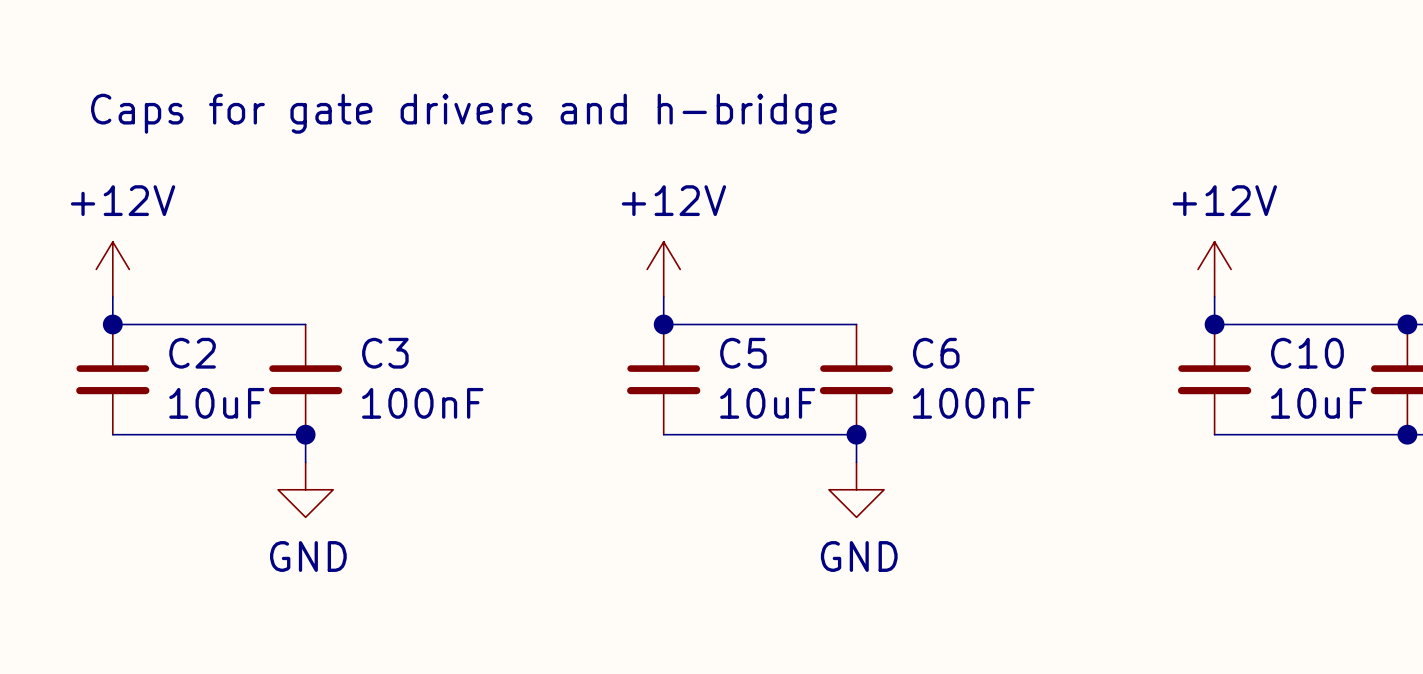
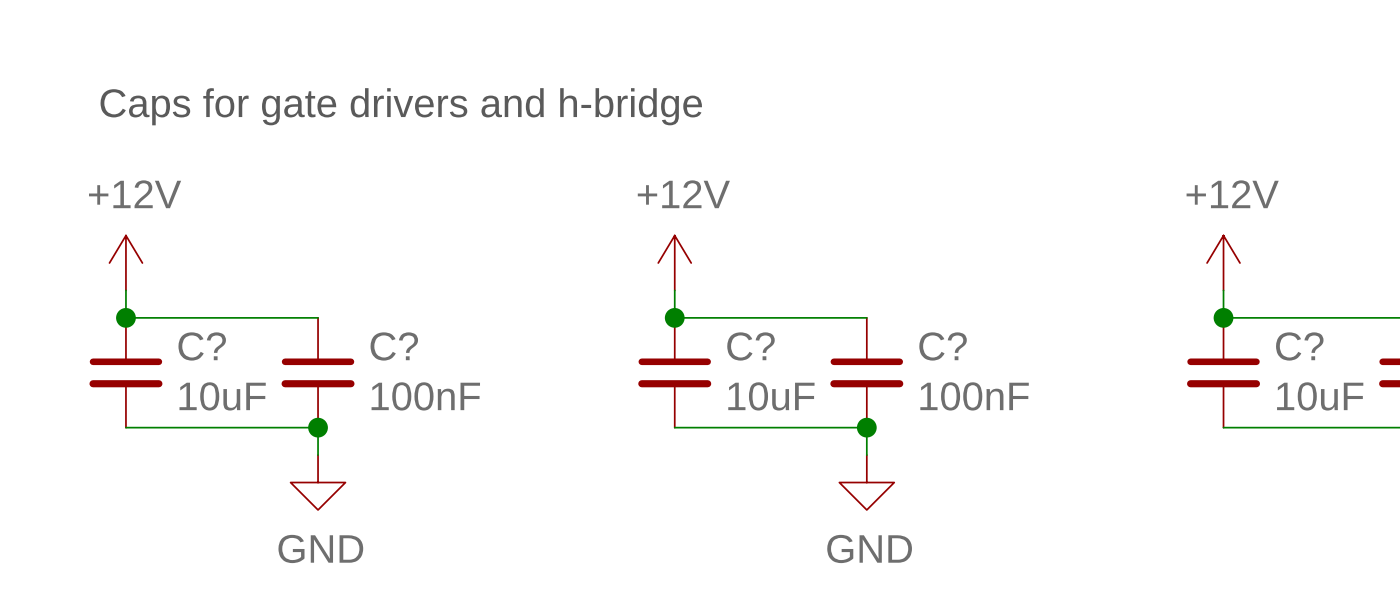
C2 name: C2 (192, 353) -> C? (202, 346)
C3 name: C3 (385, 353) -> C? (394, 346)
C5 name: C5 (743, 353) -> C? (750, 346)
C6 name: C6 (936, 353) -> C? (943, 346)
C10 name: C10 (1307, 353) -> C? (1299, 346)

